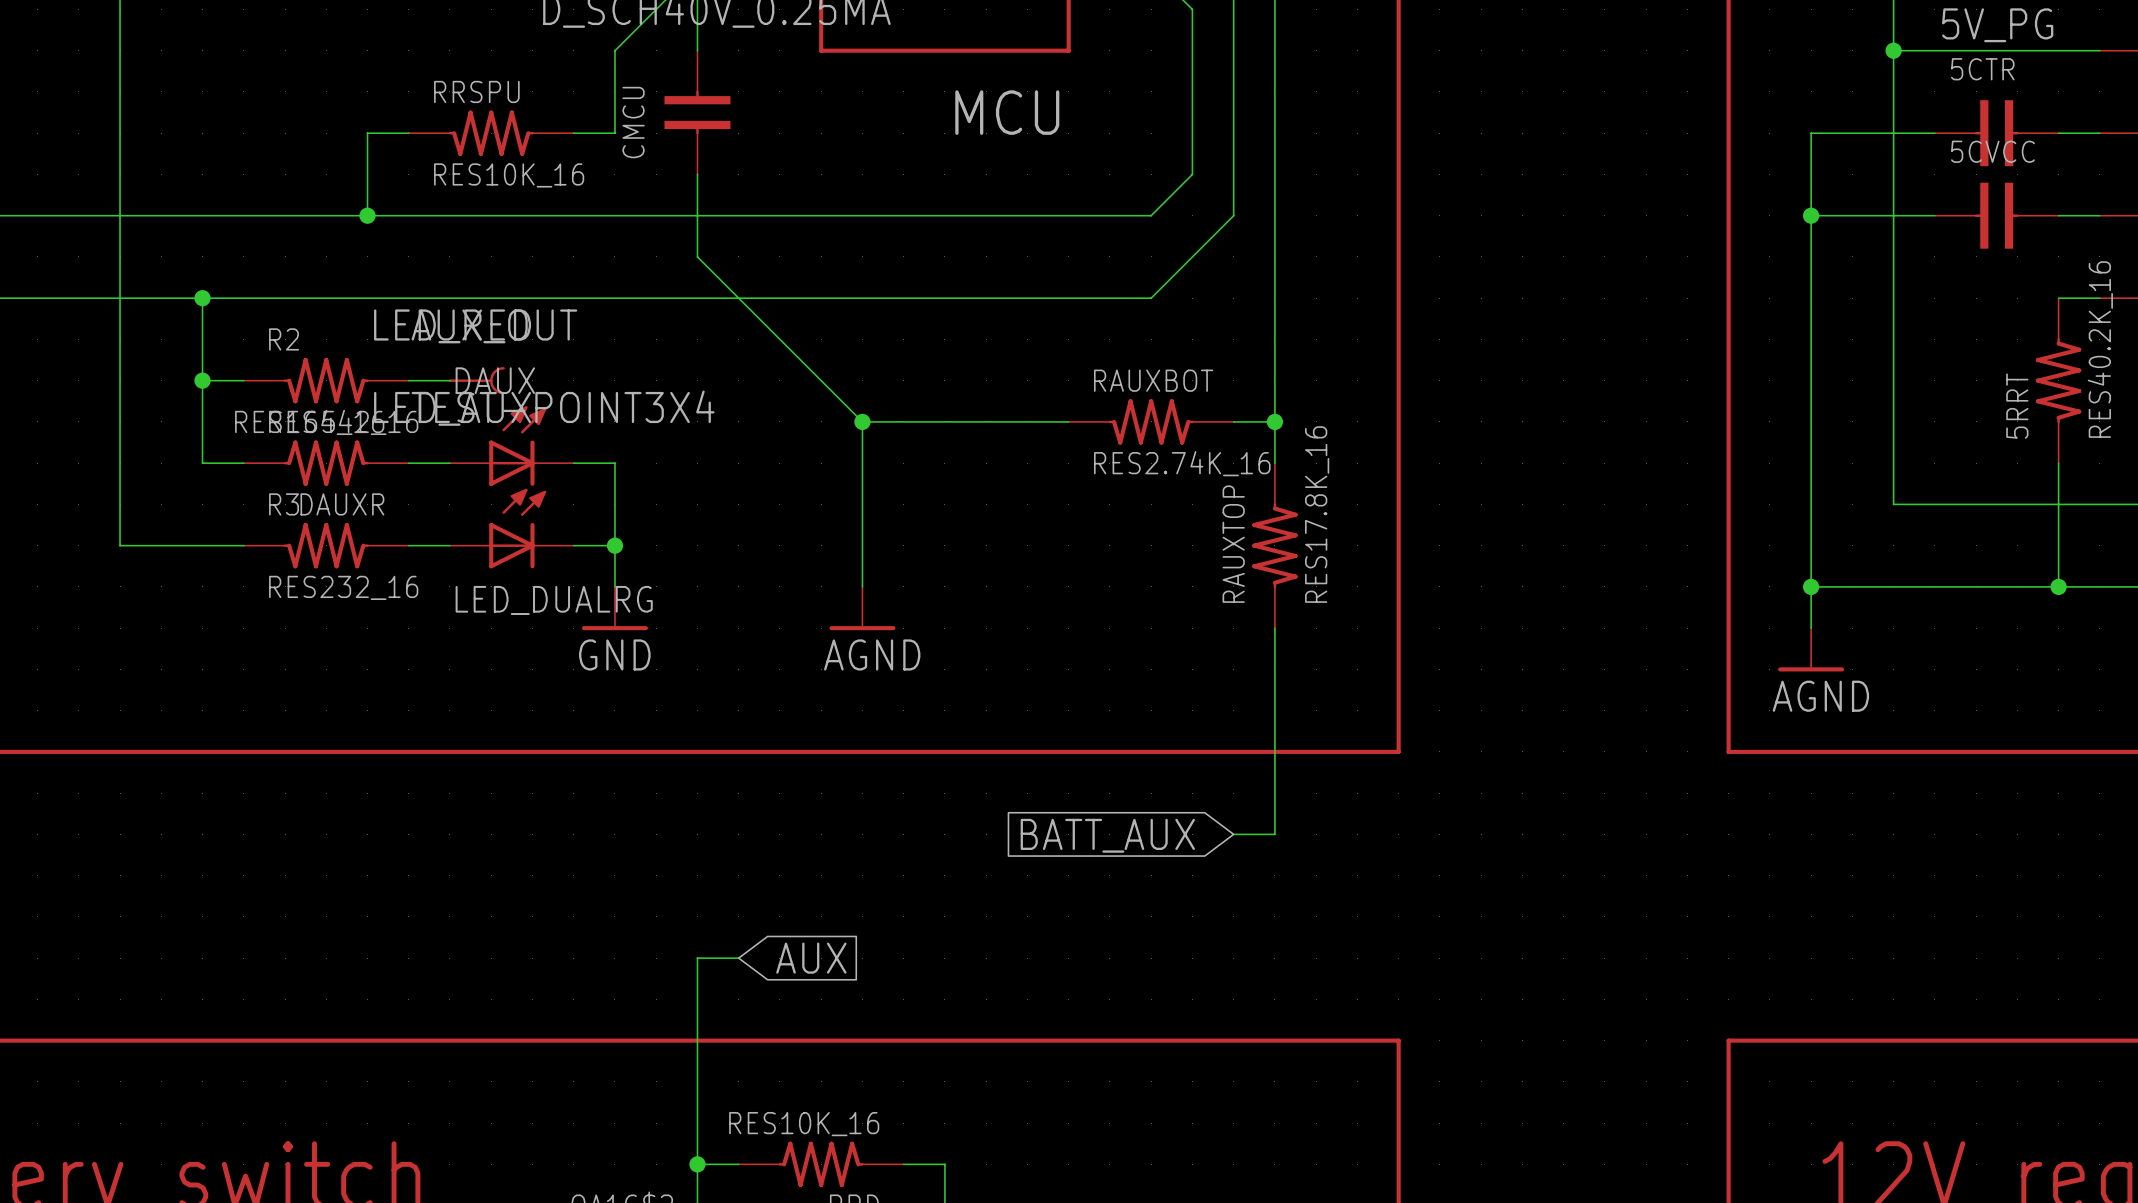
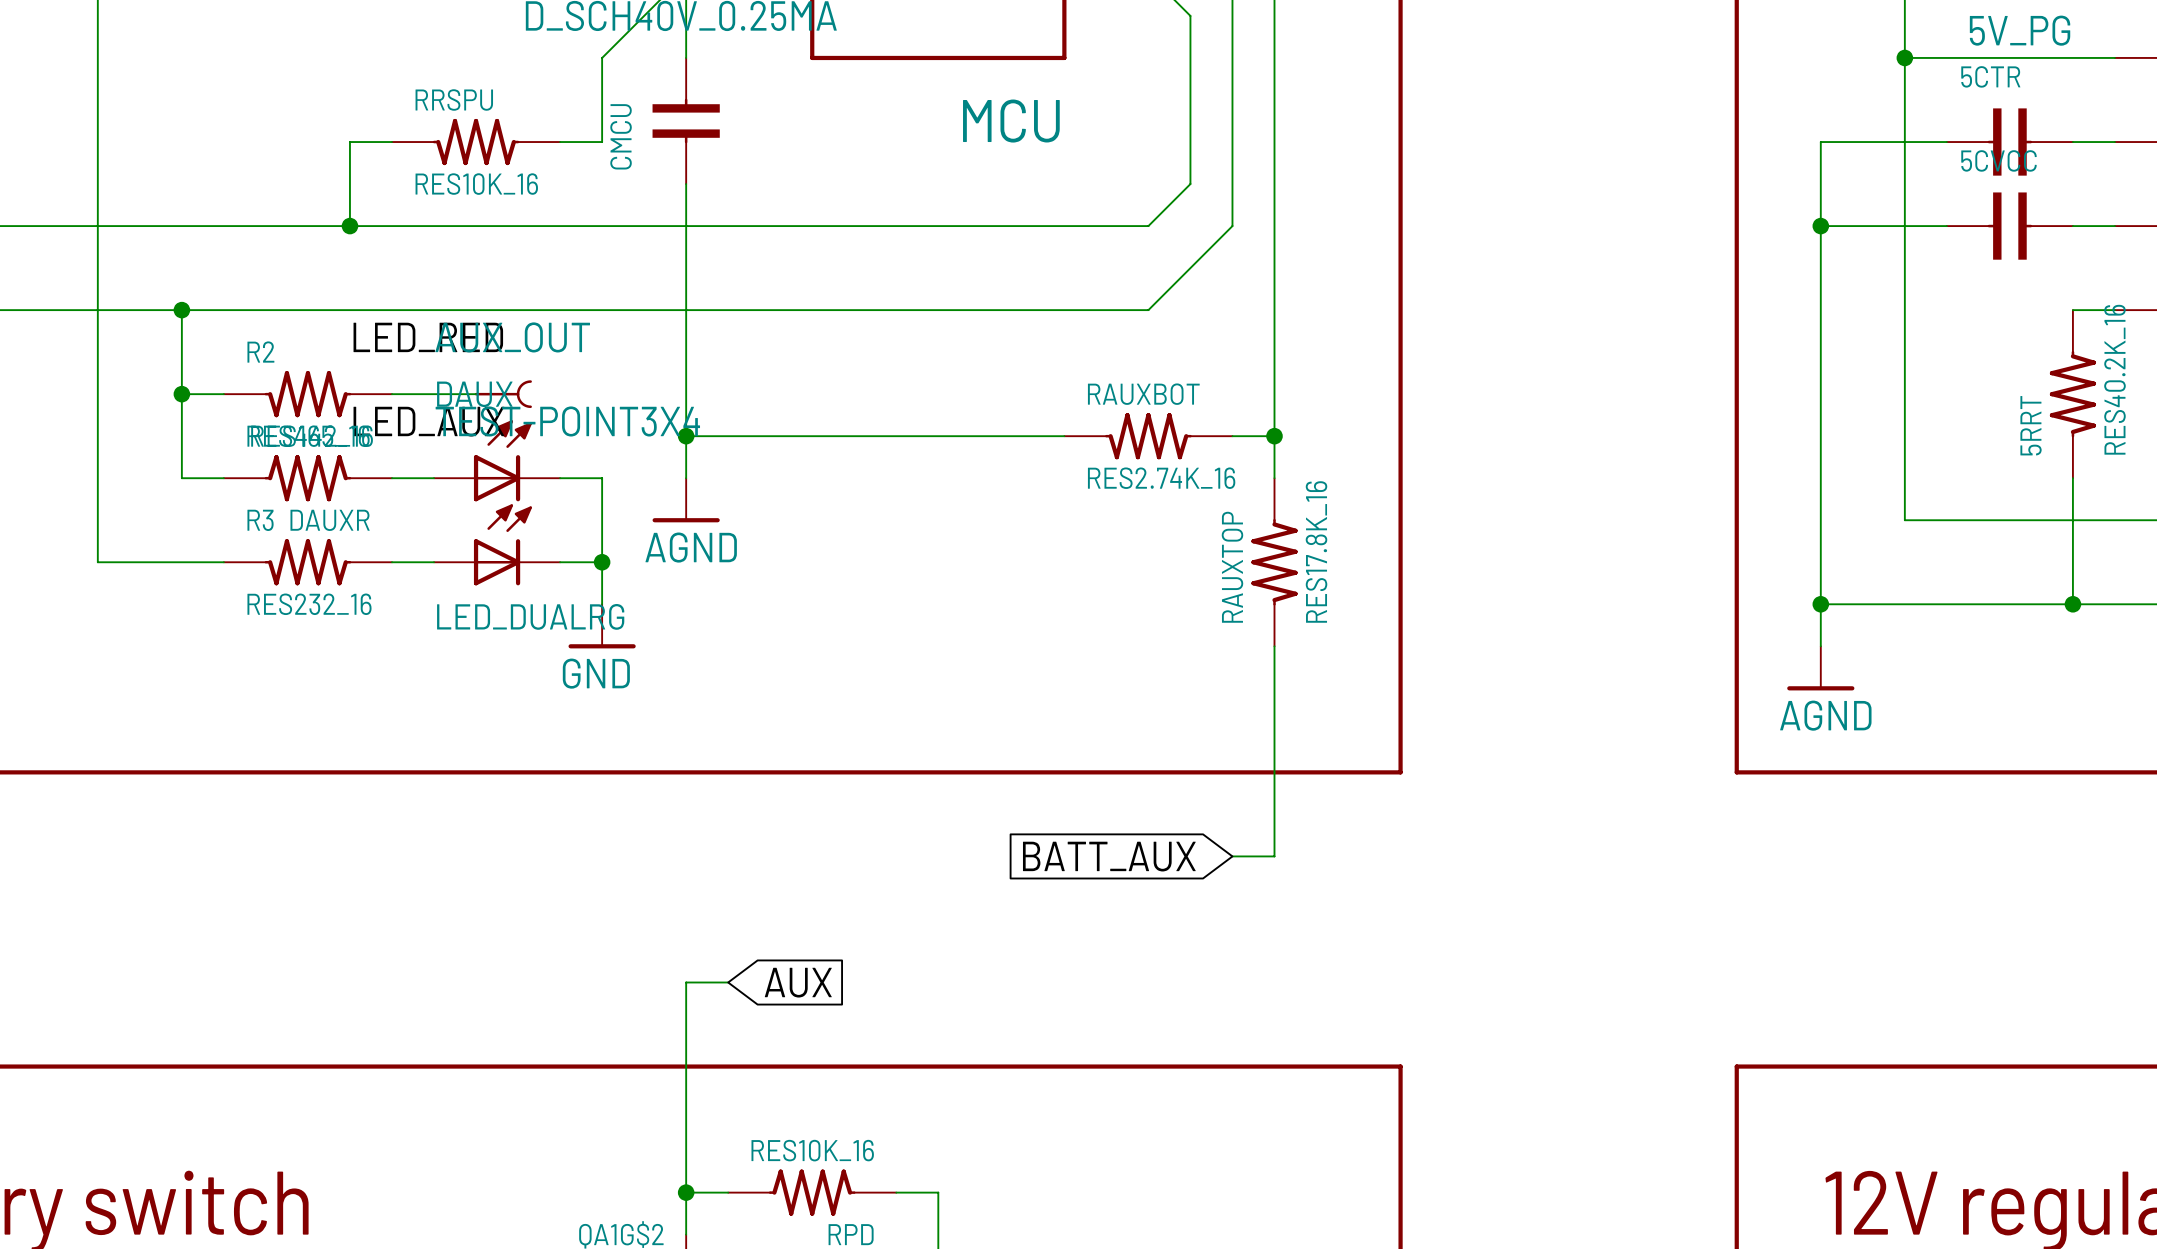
wire: (697, 256) (862, 421) (862, 586) -> (686, 268) (686, 478)
AUX_OUT position: (476, 380) -> (503, 394)
wire: none -> (686, 436) (854, 436)
junction: none -> (686, 436)
junction: (862, 421) -> none
power symbol position: AGND (862, 608) -> AGND (686, 500)

